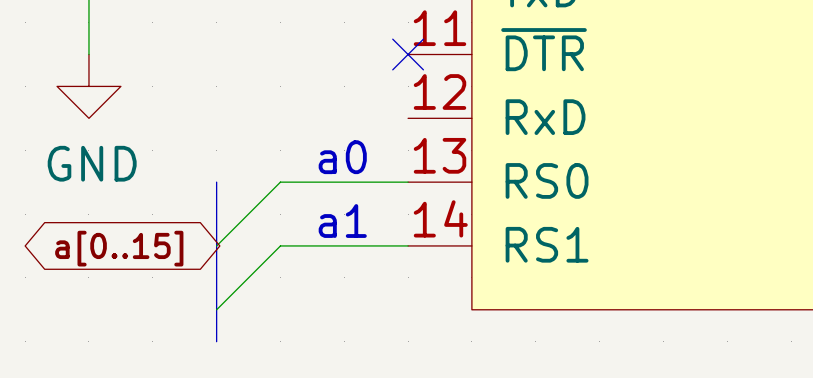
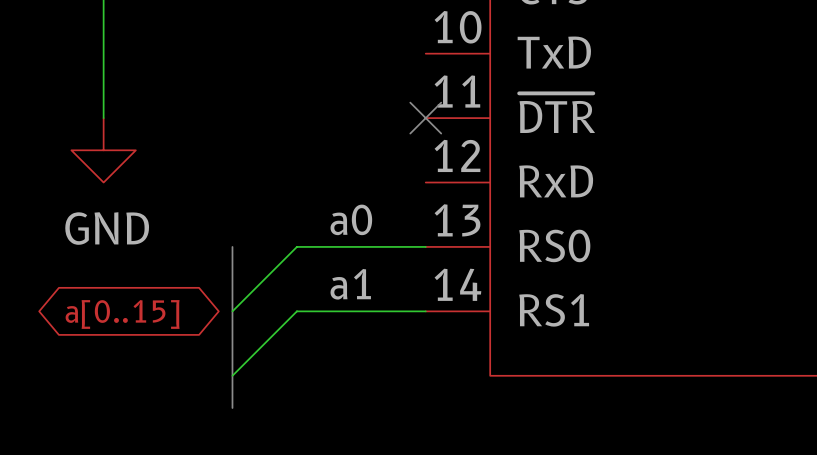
label: none -> a0 (351, 219)
text: a0 (342, 157) -> none
label: none -> a1 (350, 284)
text: a1 (342, 221) -> none

